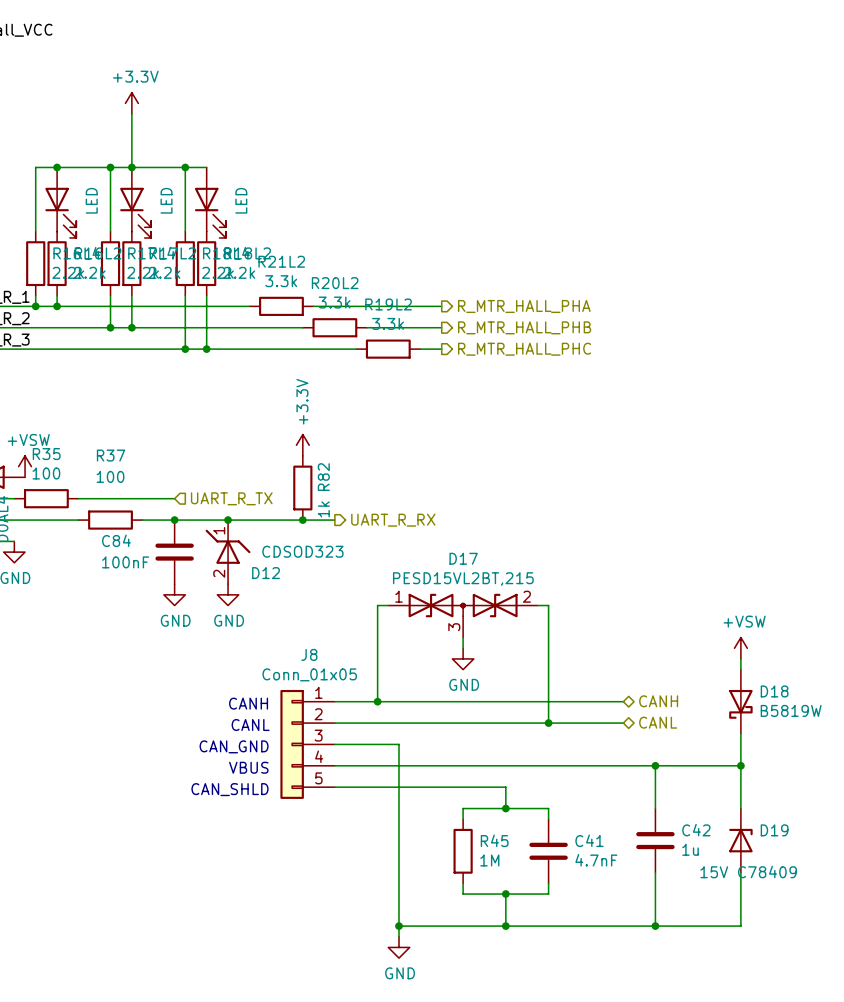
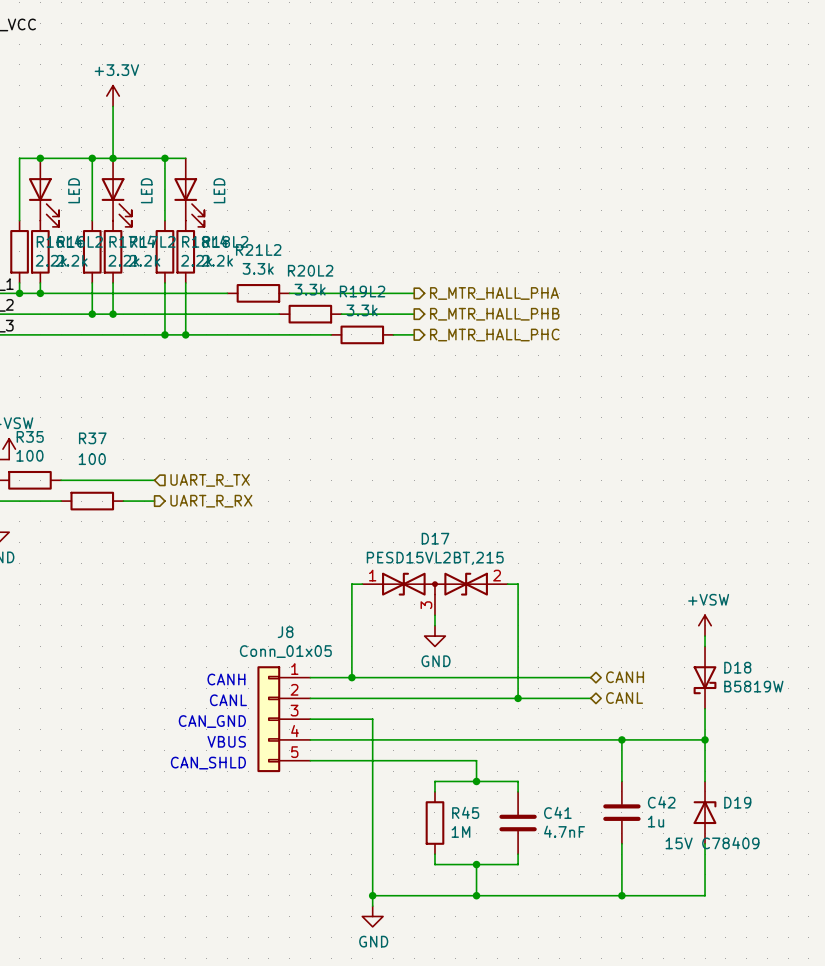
power symbol: +3.3V (302, 445) -> none
R82: 1k (302, 488) -> none
wire: (174, 520) (334, 520) -> none
junction: (174, 520) -> none
junction: (228, 520) -> none
junction: (302, 520) -> none
hierarchical label position: UART_R_RX (393, 520) -> UART_R_RX (211, 501)
C84: 100nF (174, 552) -> none
D12: CDSOD323 (228, 552) -> none
power symbol: GND (174, 594) -> none
power symbol: GND (228, 594) -> none

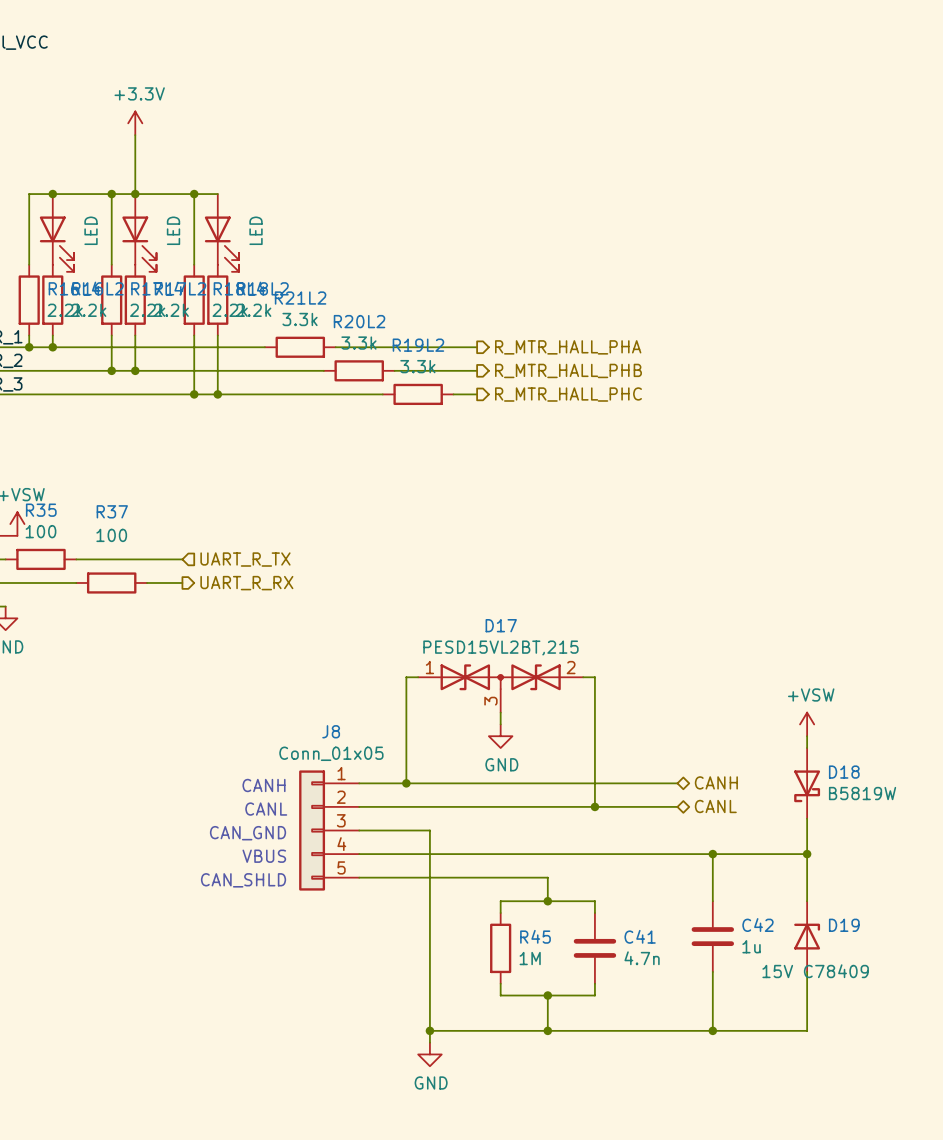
C41 value: 4.7nF (564, 831) -> 4.7n (642, 958)

